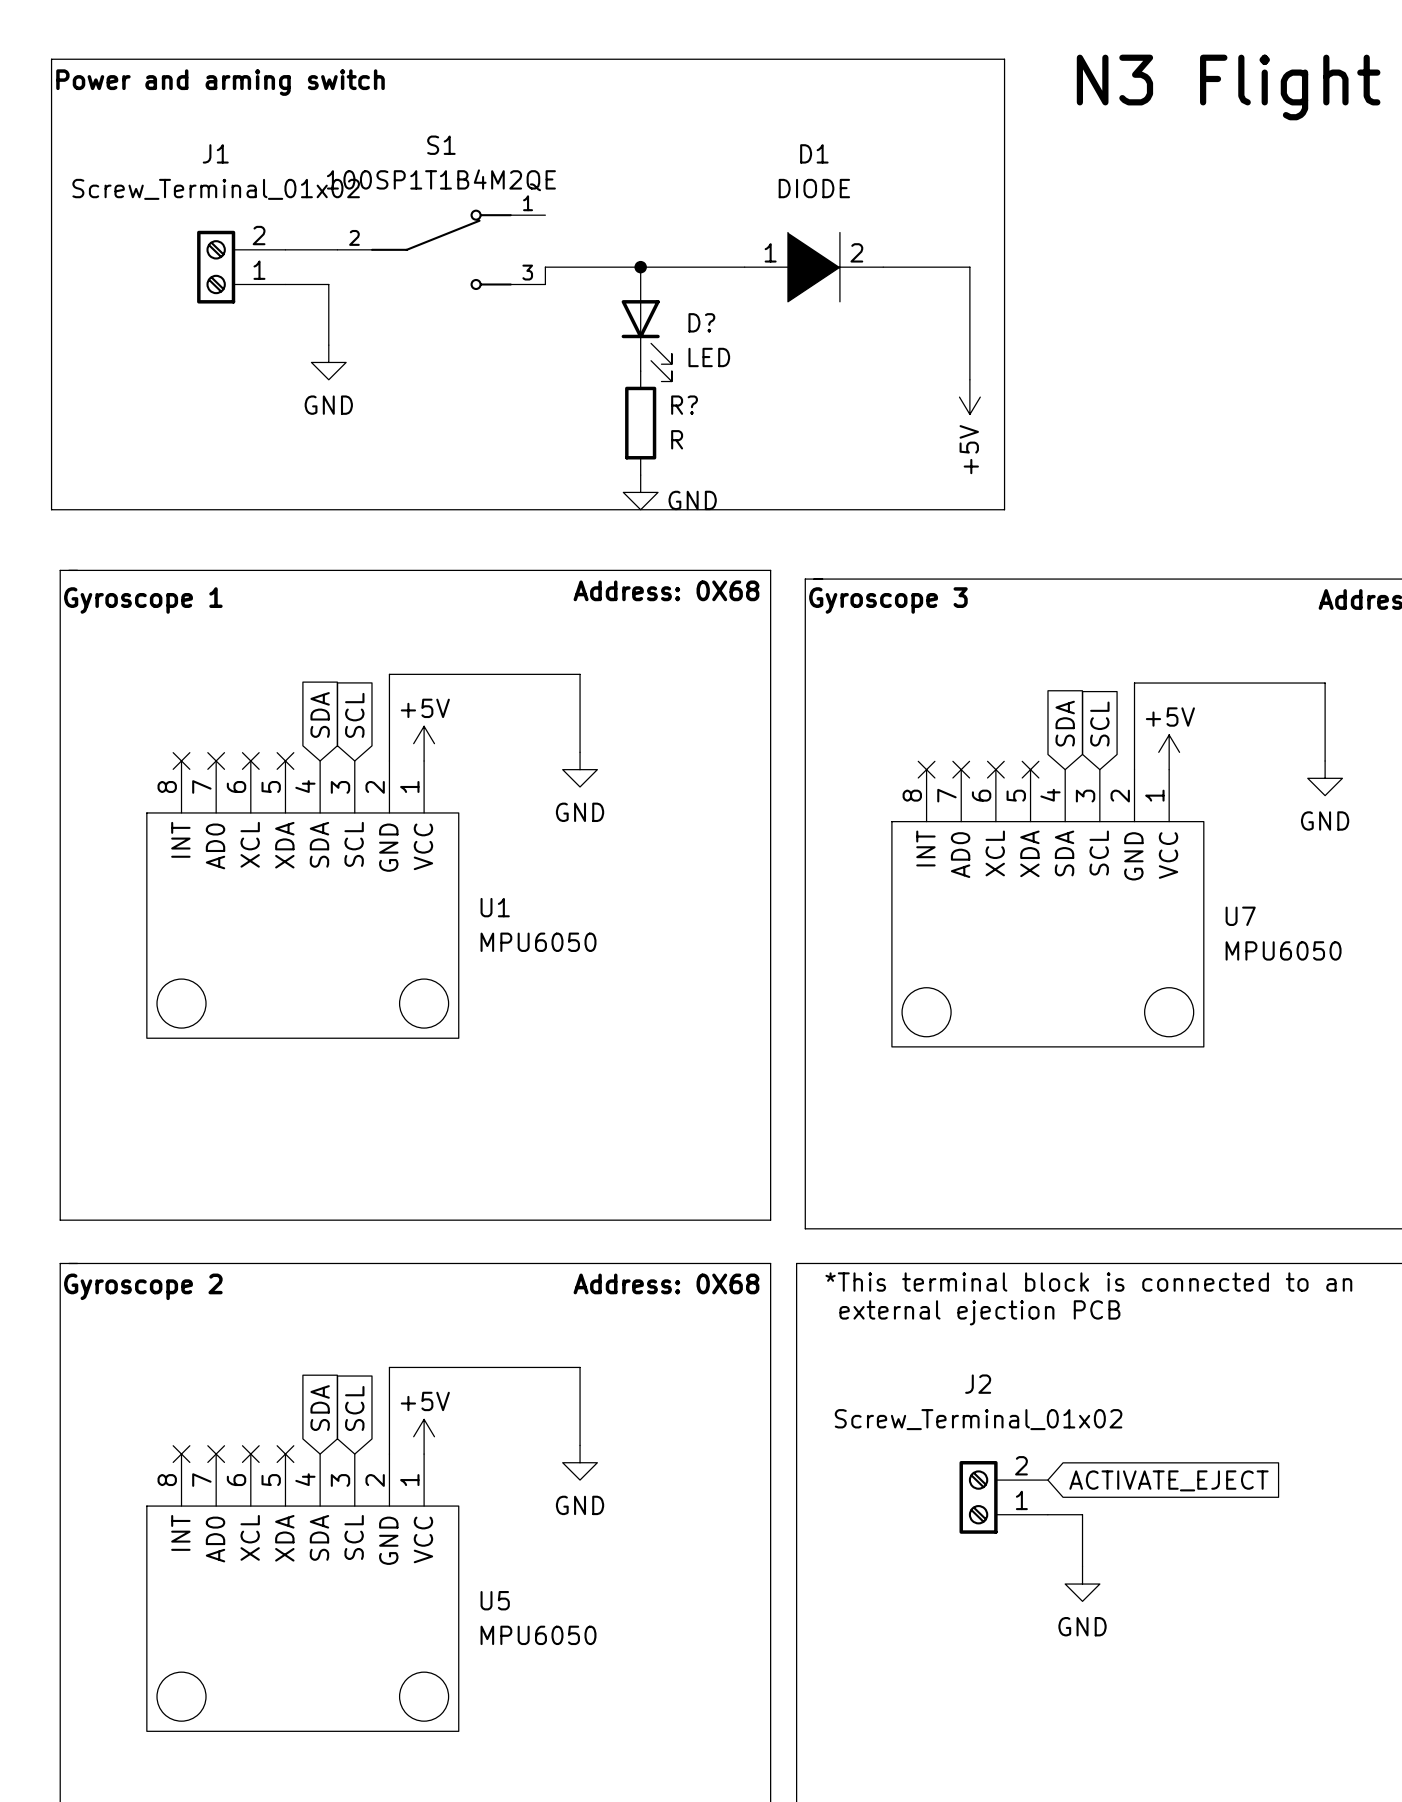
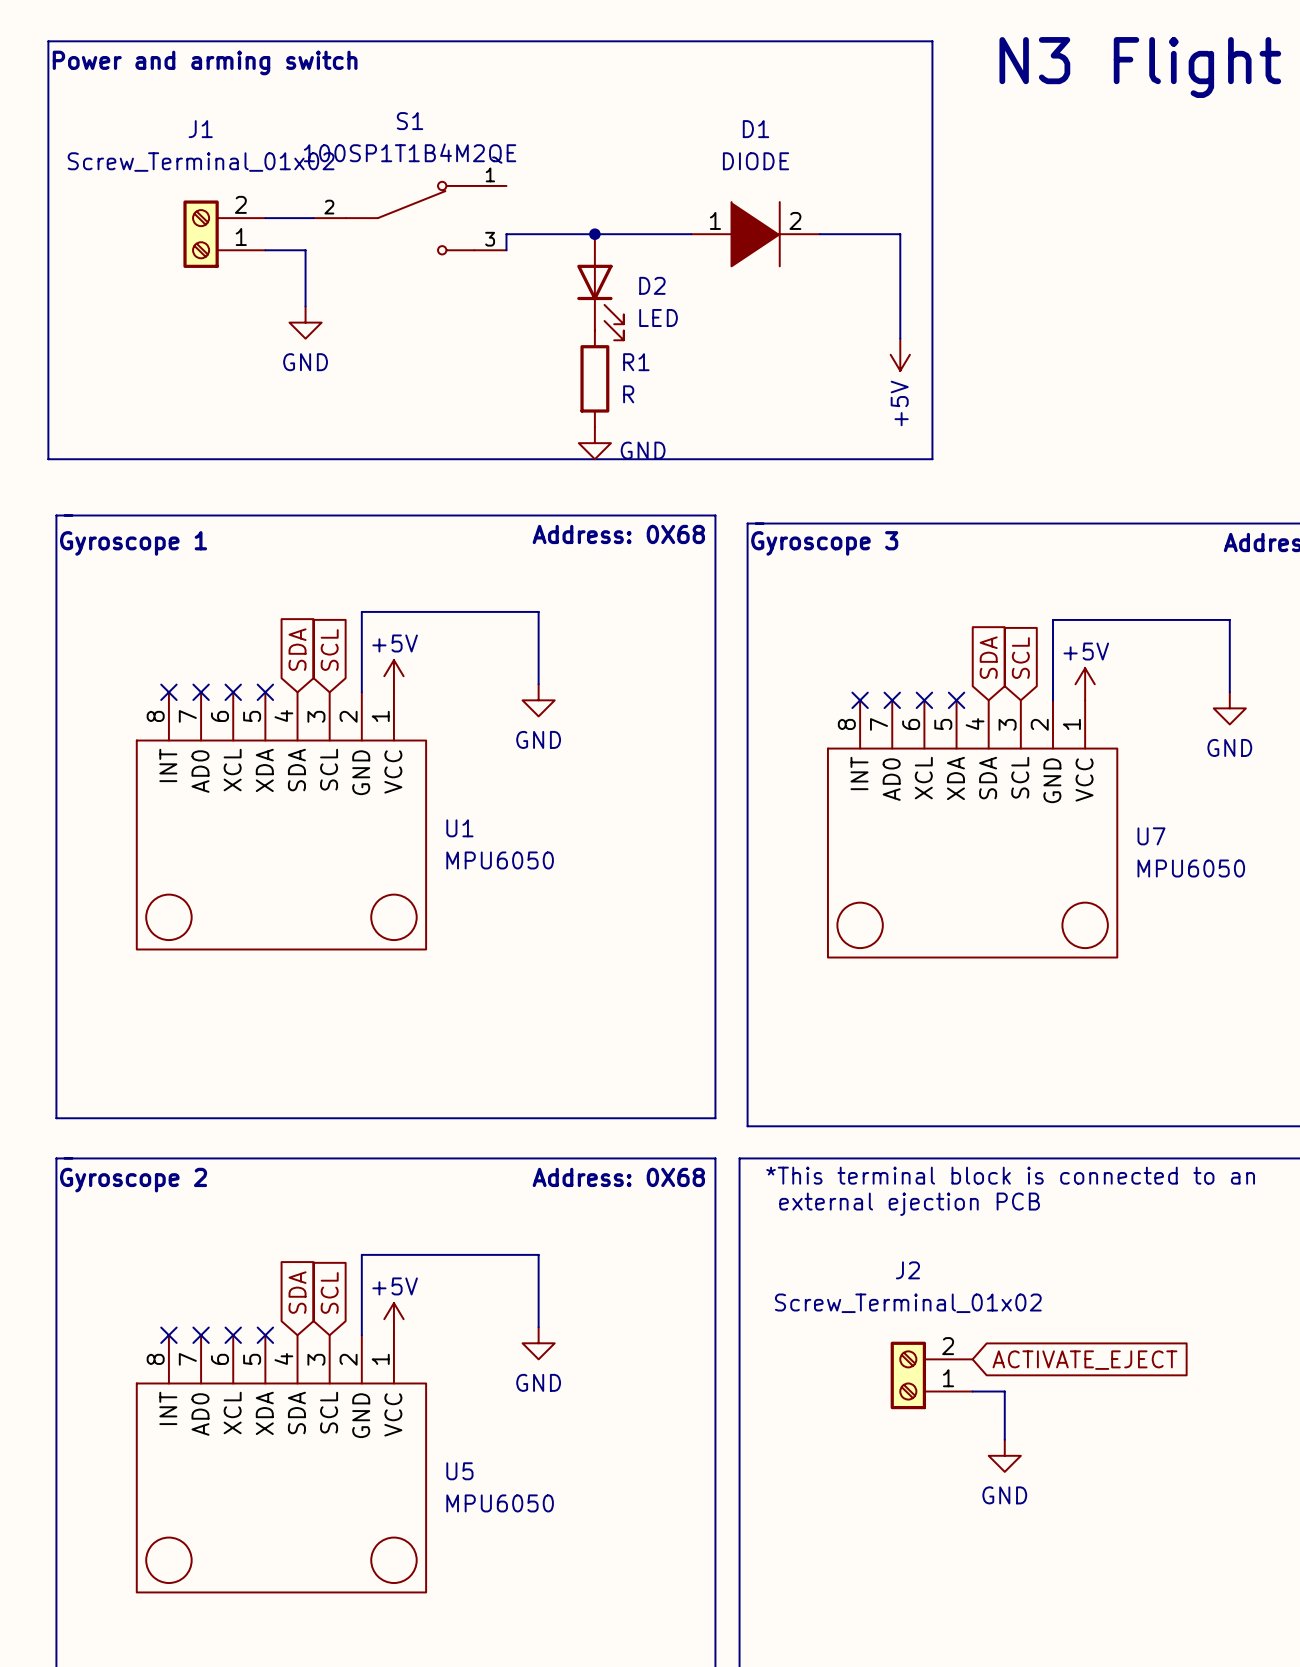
D? name: D? (701, 322) -> D2 (652, 285)
R? name: R? (684, 405) -> R1 (636, 362)

